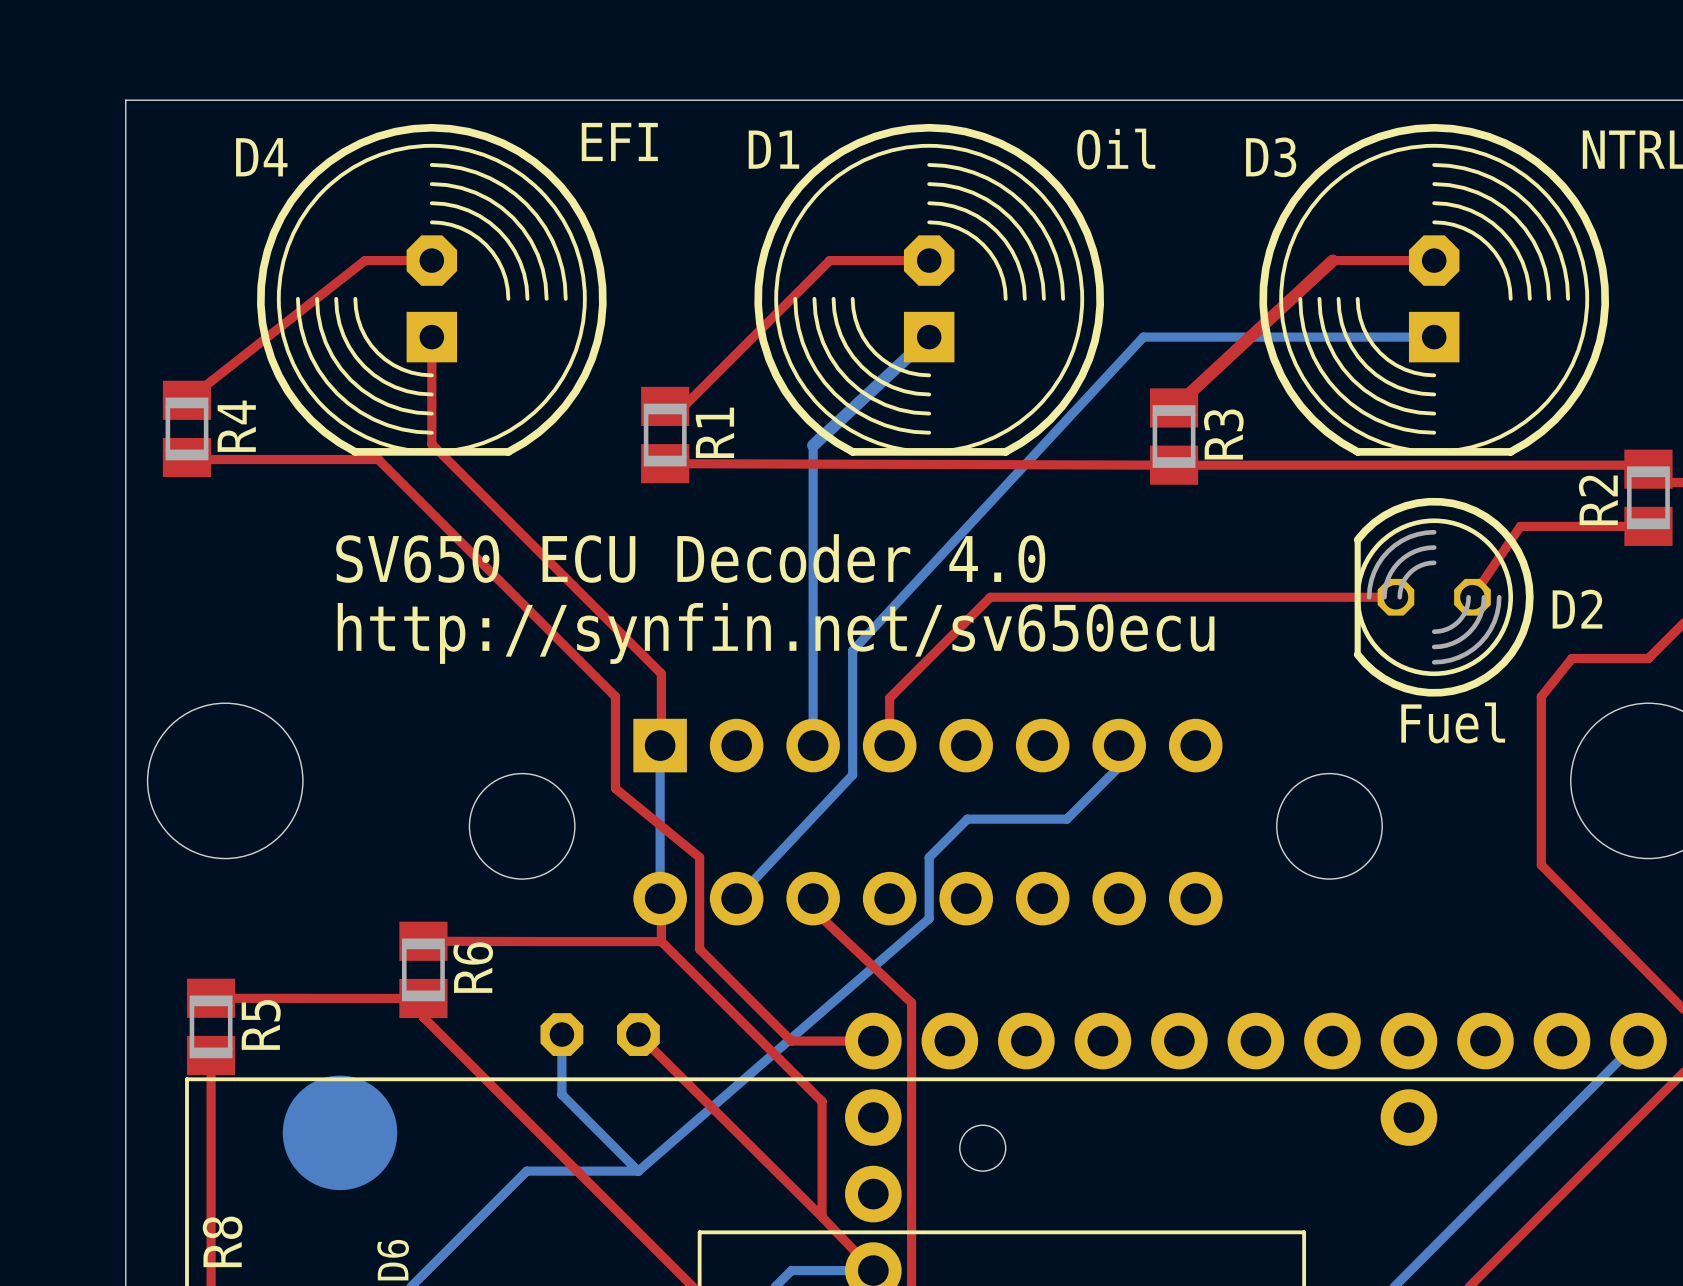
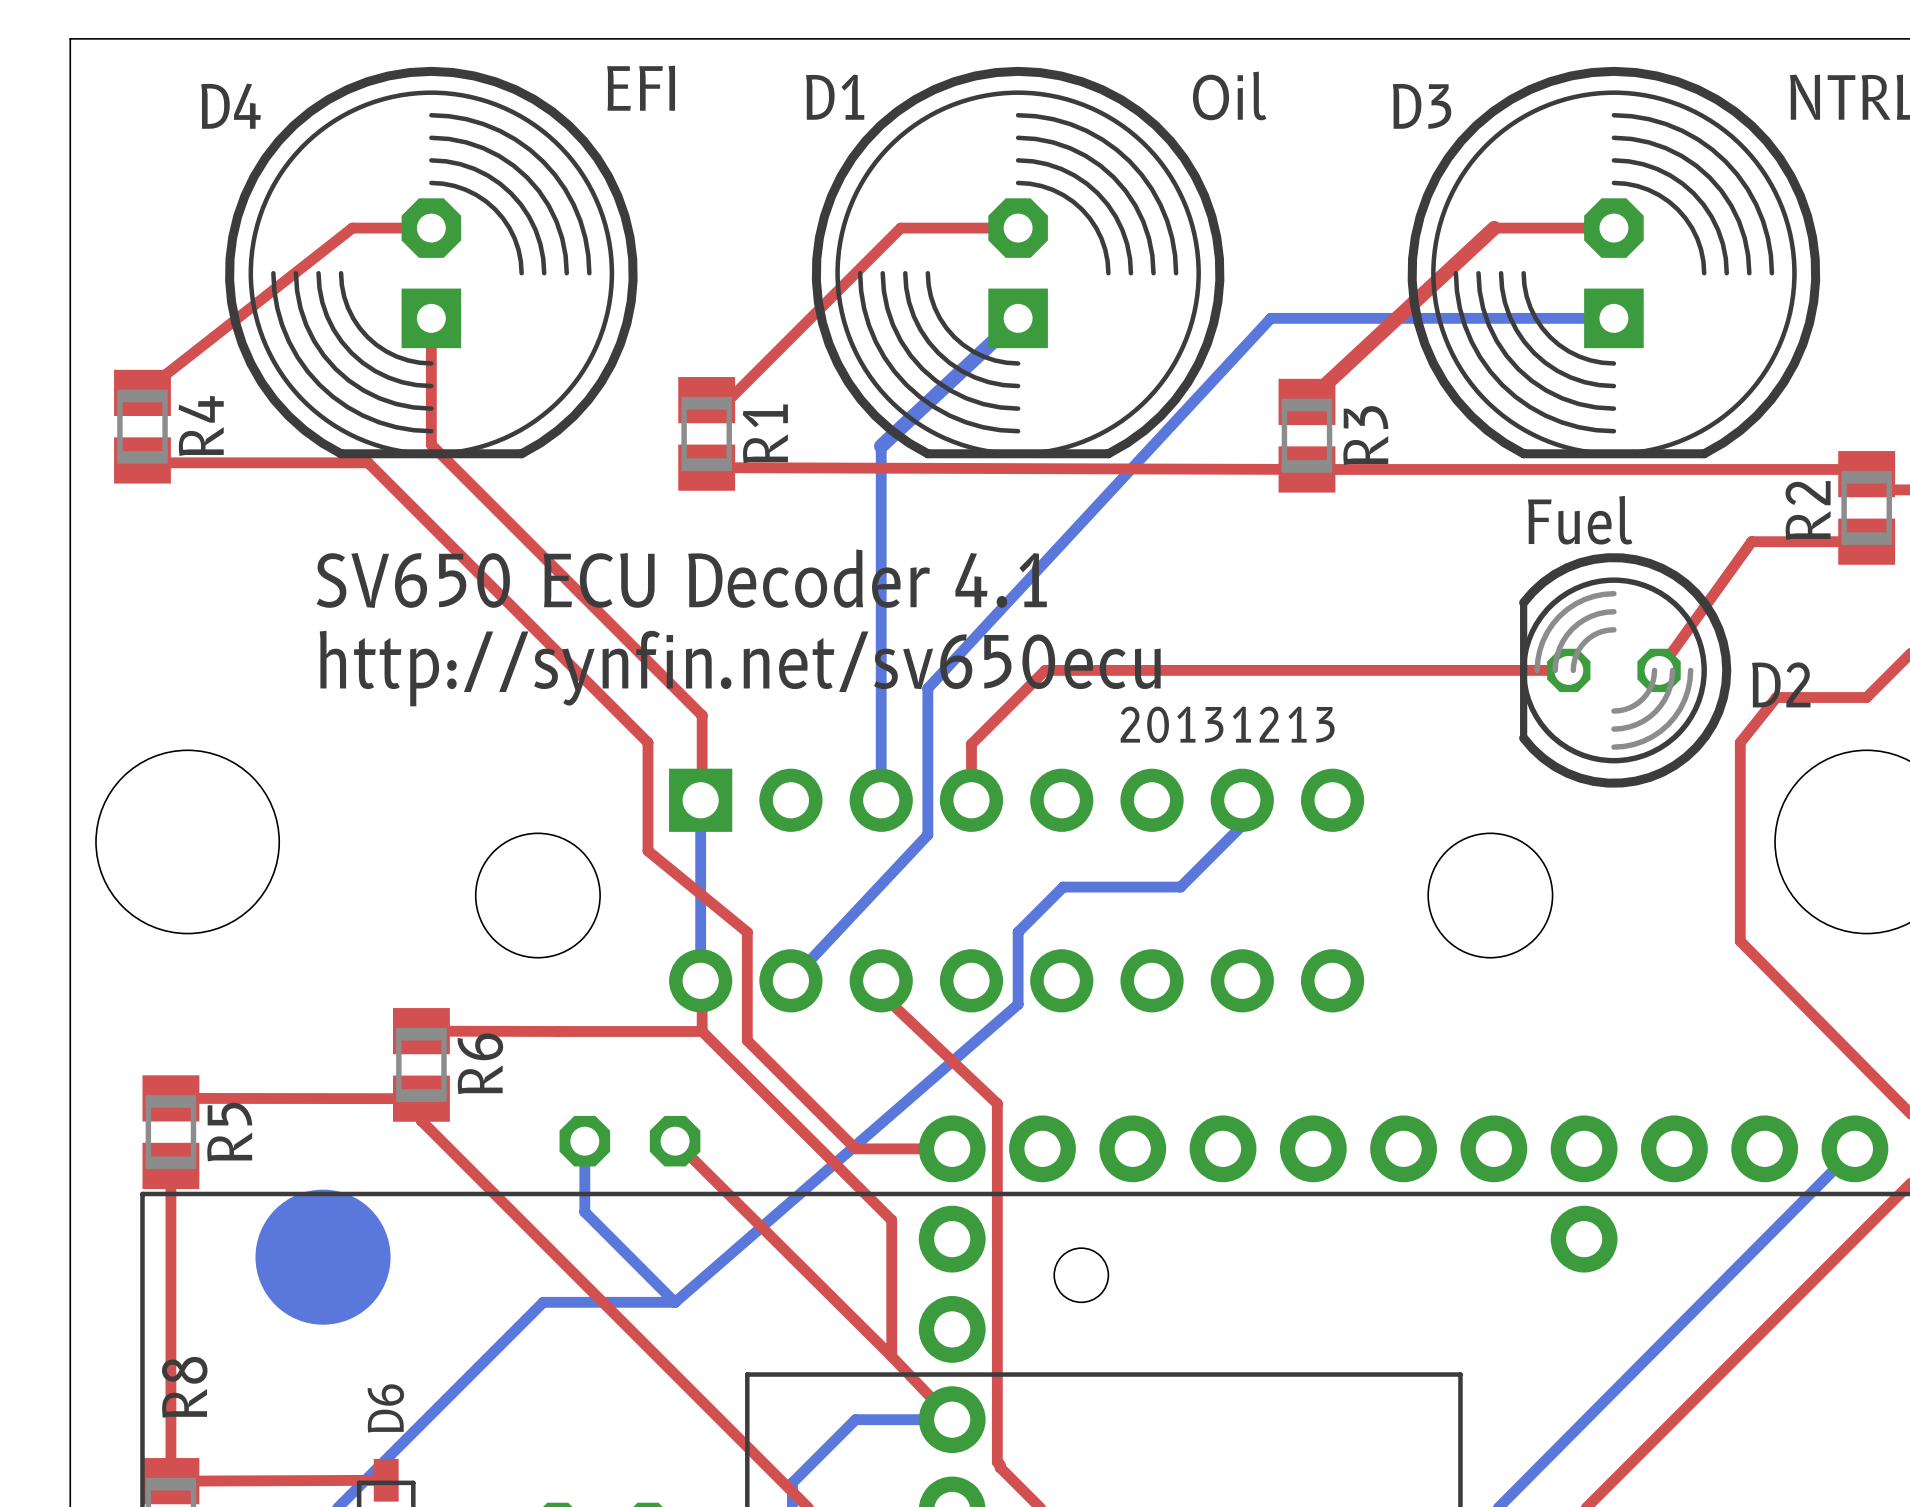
top track: (1550, 526) (1520, 526) (1472, 597) -> (1751, 541) (1659, 670)
text: SV650 ECU Decoder 4.0 (690, 558) -> SV650 ECU Decoder 4.1 (681, 578)
top track: (1395, 597) (990, 597) (952, 635) -> (1568, 670) (1045, 670)
D2 position: (1443, 597) -> (1625, 670)
text: none -> 20131213 (1227, 724)
text position: Fuel (1453, 722) -> Fuel (1580, 520)

